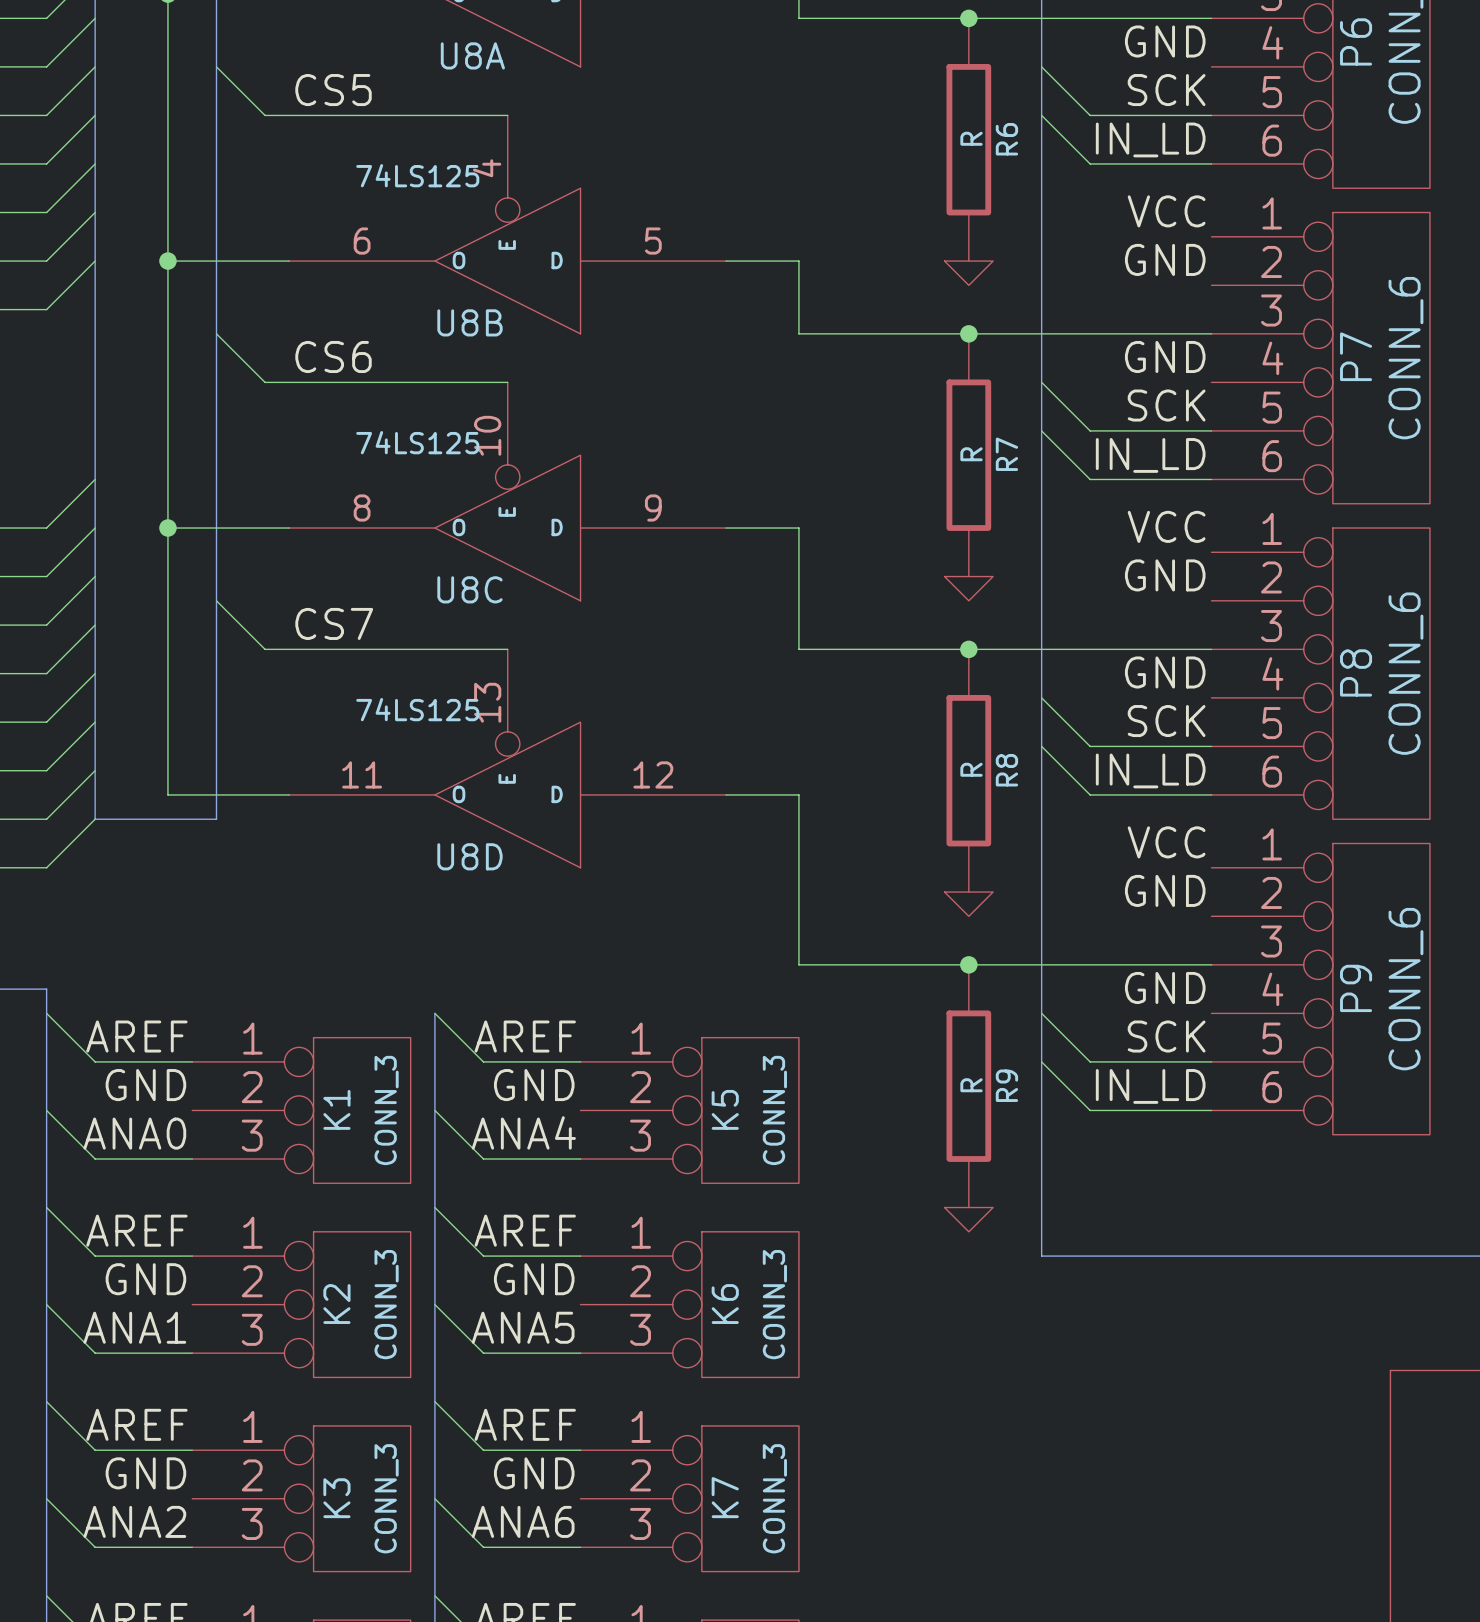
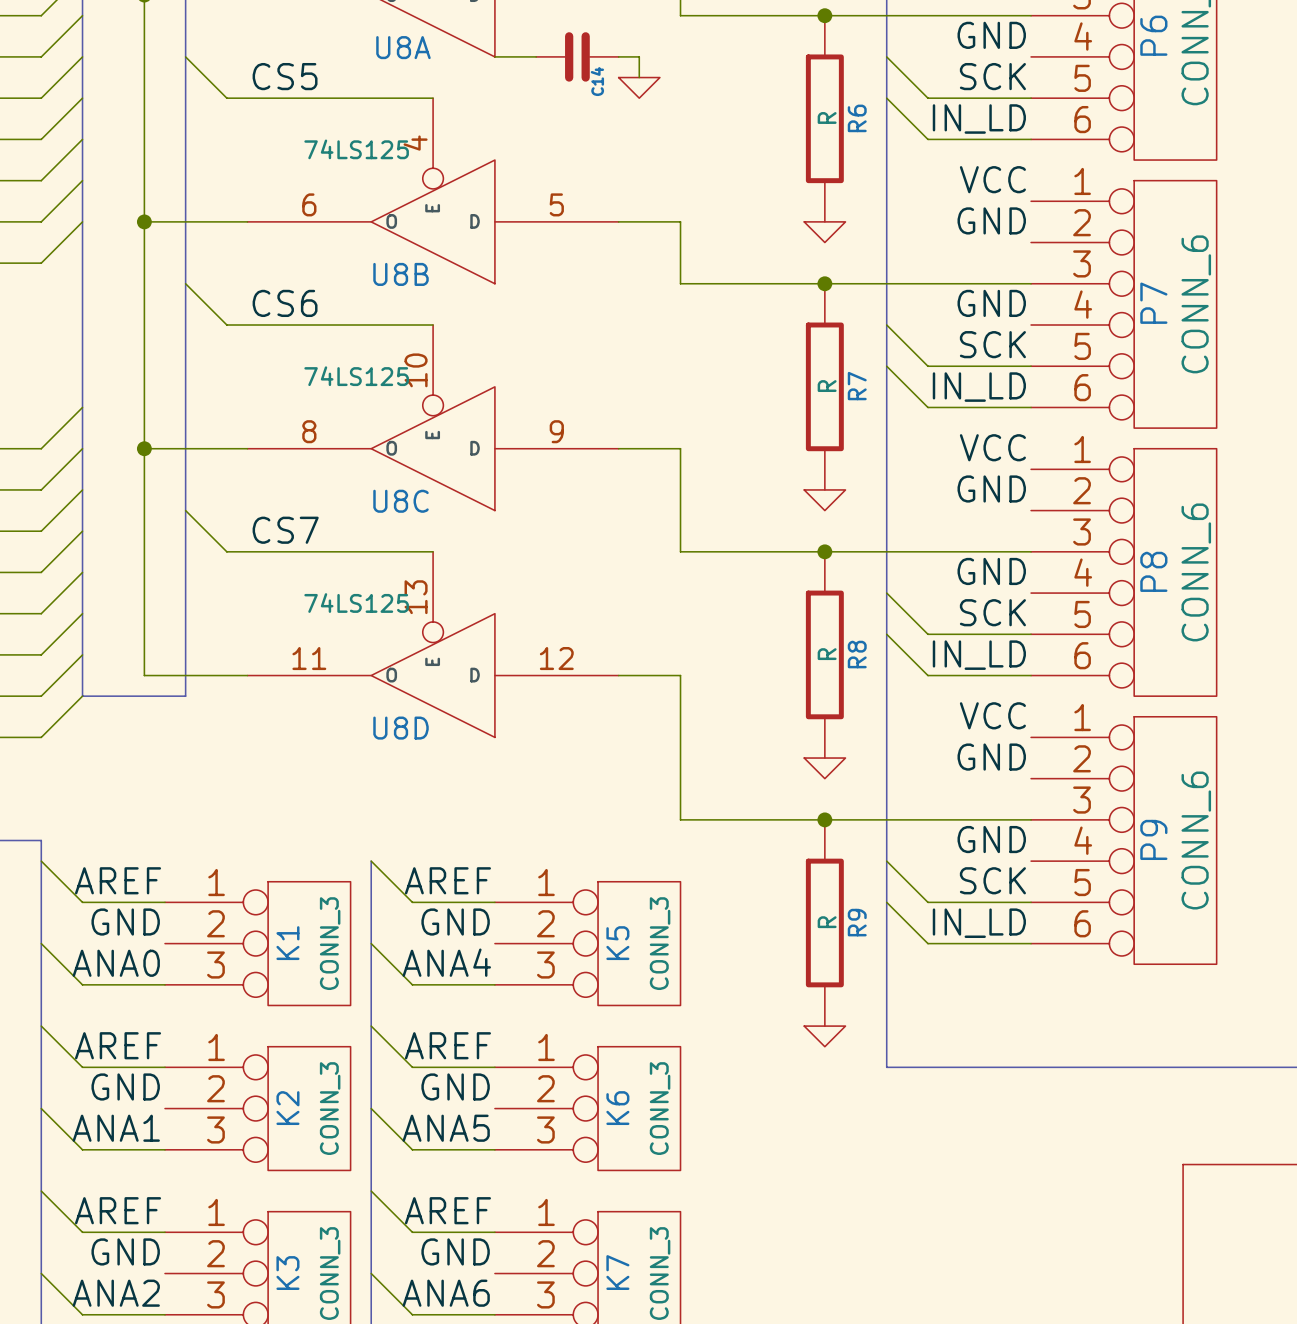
wire: none -> (494, 56) (536, 56)
C14: none -> (577, 56)
wire: none -> (618, 56) (639, 56) (639, 77)
power symbol: none -> (639, 87)

